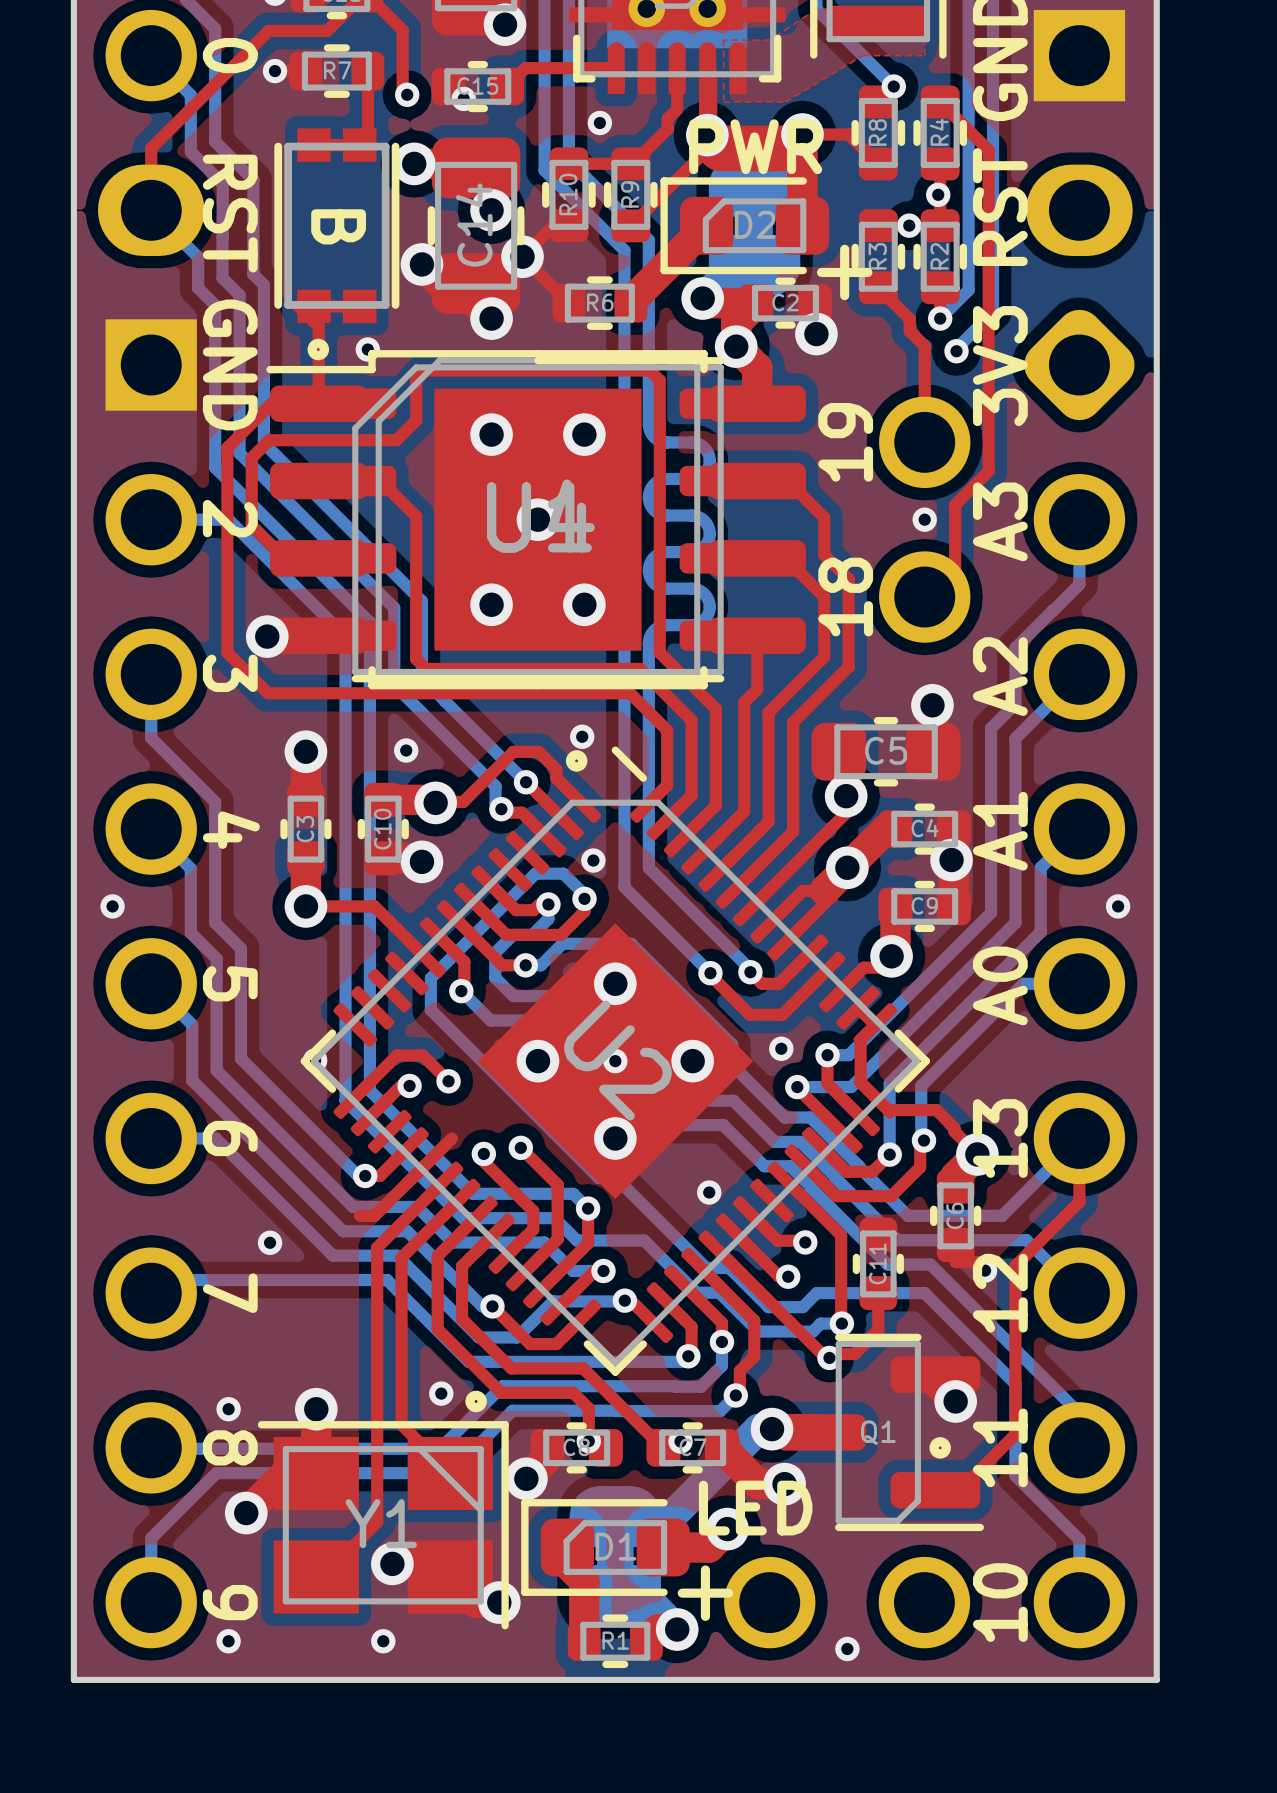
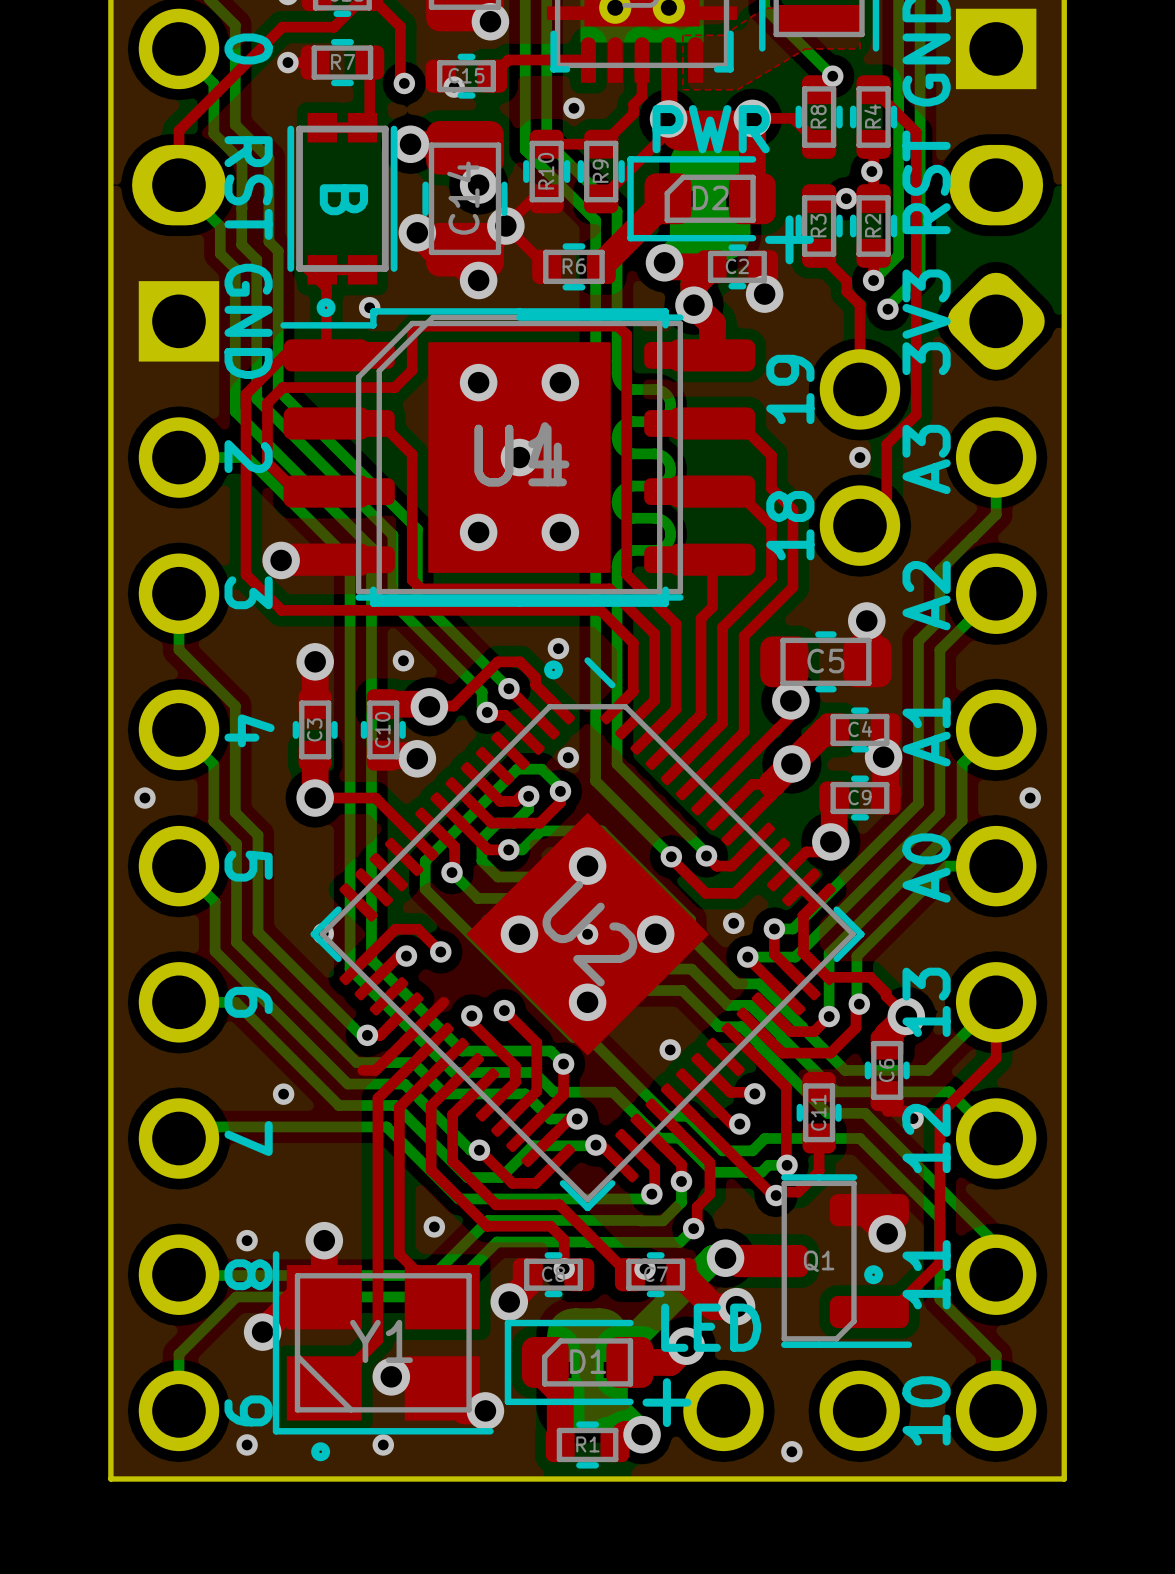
drawing position: (476, 1401) -> (320, 1451)
Y1 rotation: 0° (383, 1525) -> 180° (383, 1342)

